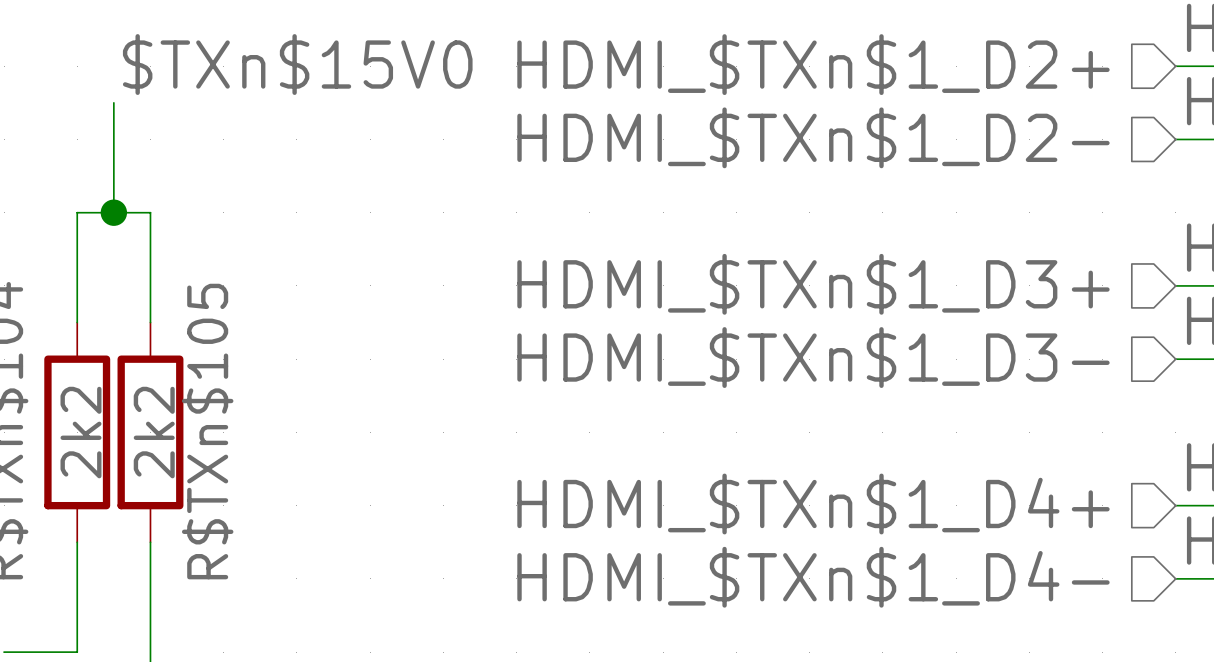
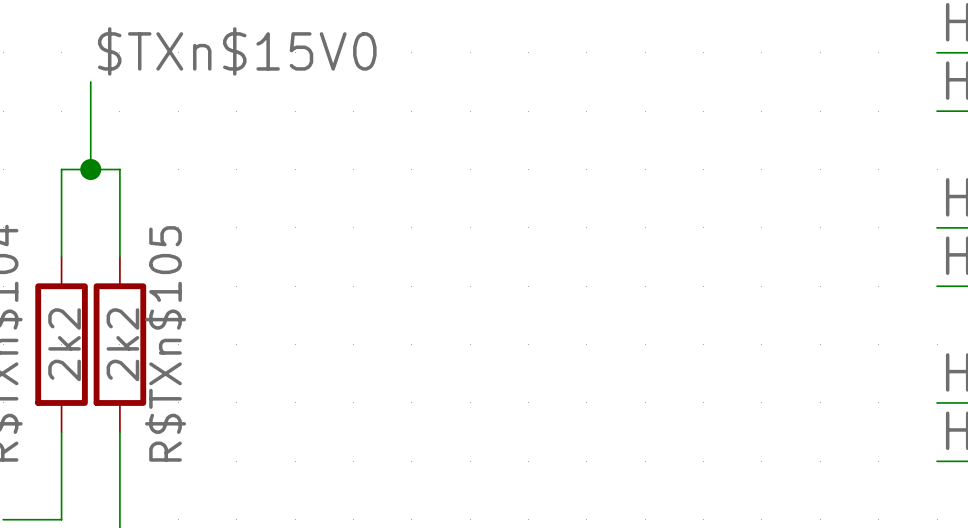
hierarchical label: HDMI_$TXn$1_D2+ (813, 64) -> none
hierarchical label: HDMI_$TXn$1_D2- (813, 137) -> none
hierarchical label: HDMI_$TXn$1_D3+ (813, 284) -> none
hierarchical label: HDMI_$TXn$1_D3- (813, 357) -> none
hierarchical label: HDMI_$TXn$1_D4+ (813, 504) -> none
hierarchical label: HDMI_$TXn$1_D4- (813, 577) -> none

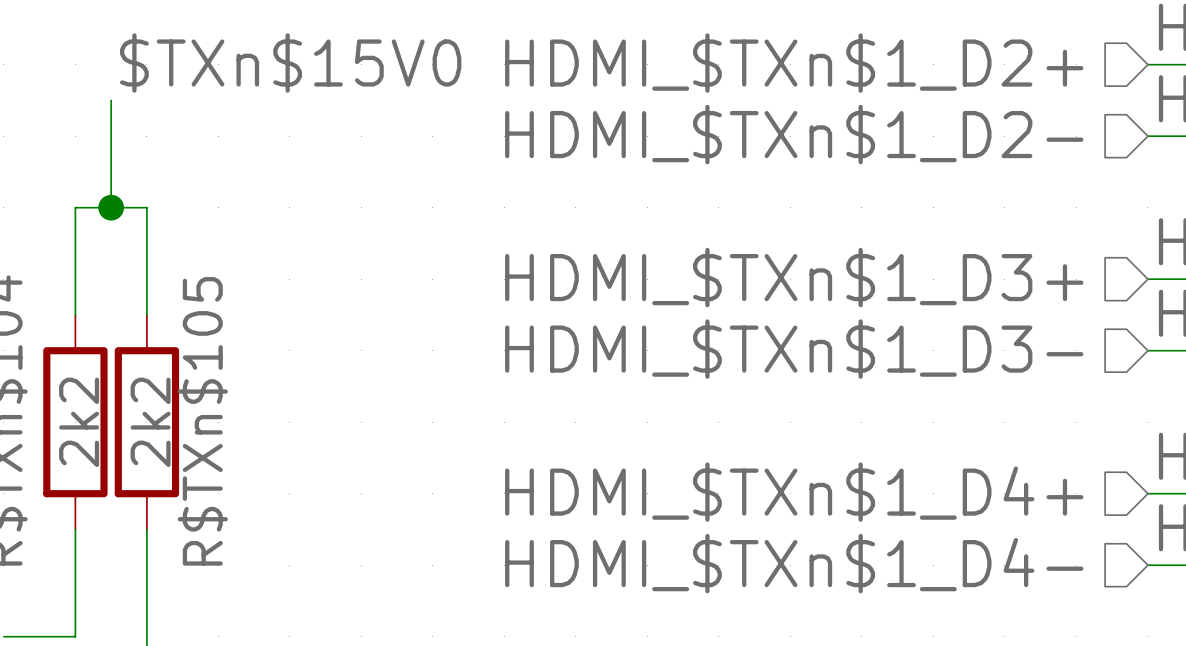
hierarchical label: none -> HDMI_$TXn$1_D2+ (794, 63)
hierarchical label: none -> HDMI_$TXn$1_D2- (794, 134)
hierarchical label: none -> HDMI_$TXn$1_D3+ (794, 277)
hierarchical label: none -> HDMI_$TXn$1_D3- (794, 349)
hierarchical label: none -> HDMI_$TXn$1_D4+ (794, 492)
hierarchical label: none -> HDMI_$TXn$1_D4- (794, 563)

